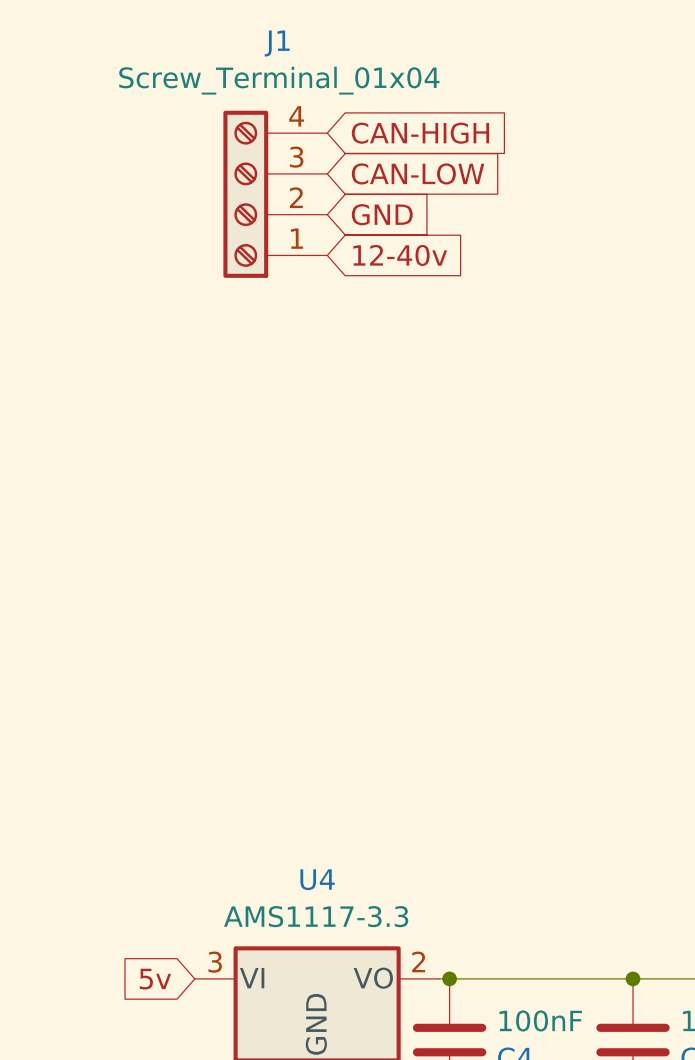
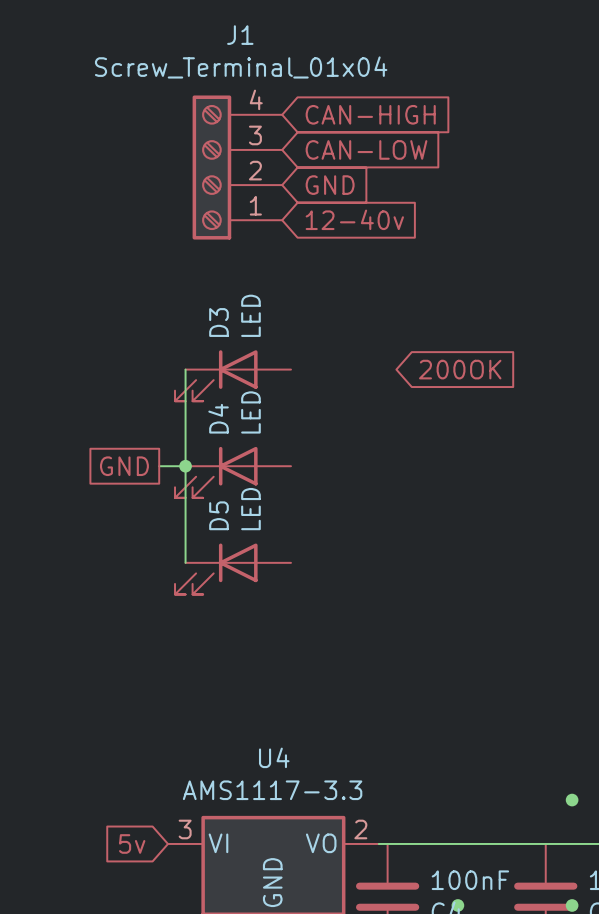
wire: none -> (185, 369) (185, 562)
global label: none -> 200OK (460, 369)
D3: none -> LED (232, 375)
global label: none -> GND (124, 466)
wire: none -> (159, 466) (185, 466)
junction: none -> (185, 466)
D4: none -> LED (232, 472)
D5: none -> LED (232, 569)
junction: none -> (572, 800)
junction: (449, 978) -> none
junction: (633, 978) -> none
junction: none -> (457, 905)
junction: none -> (572, 905)

